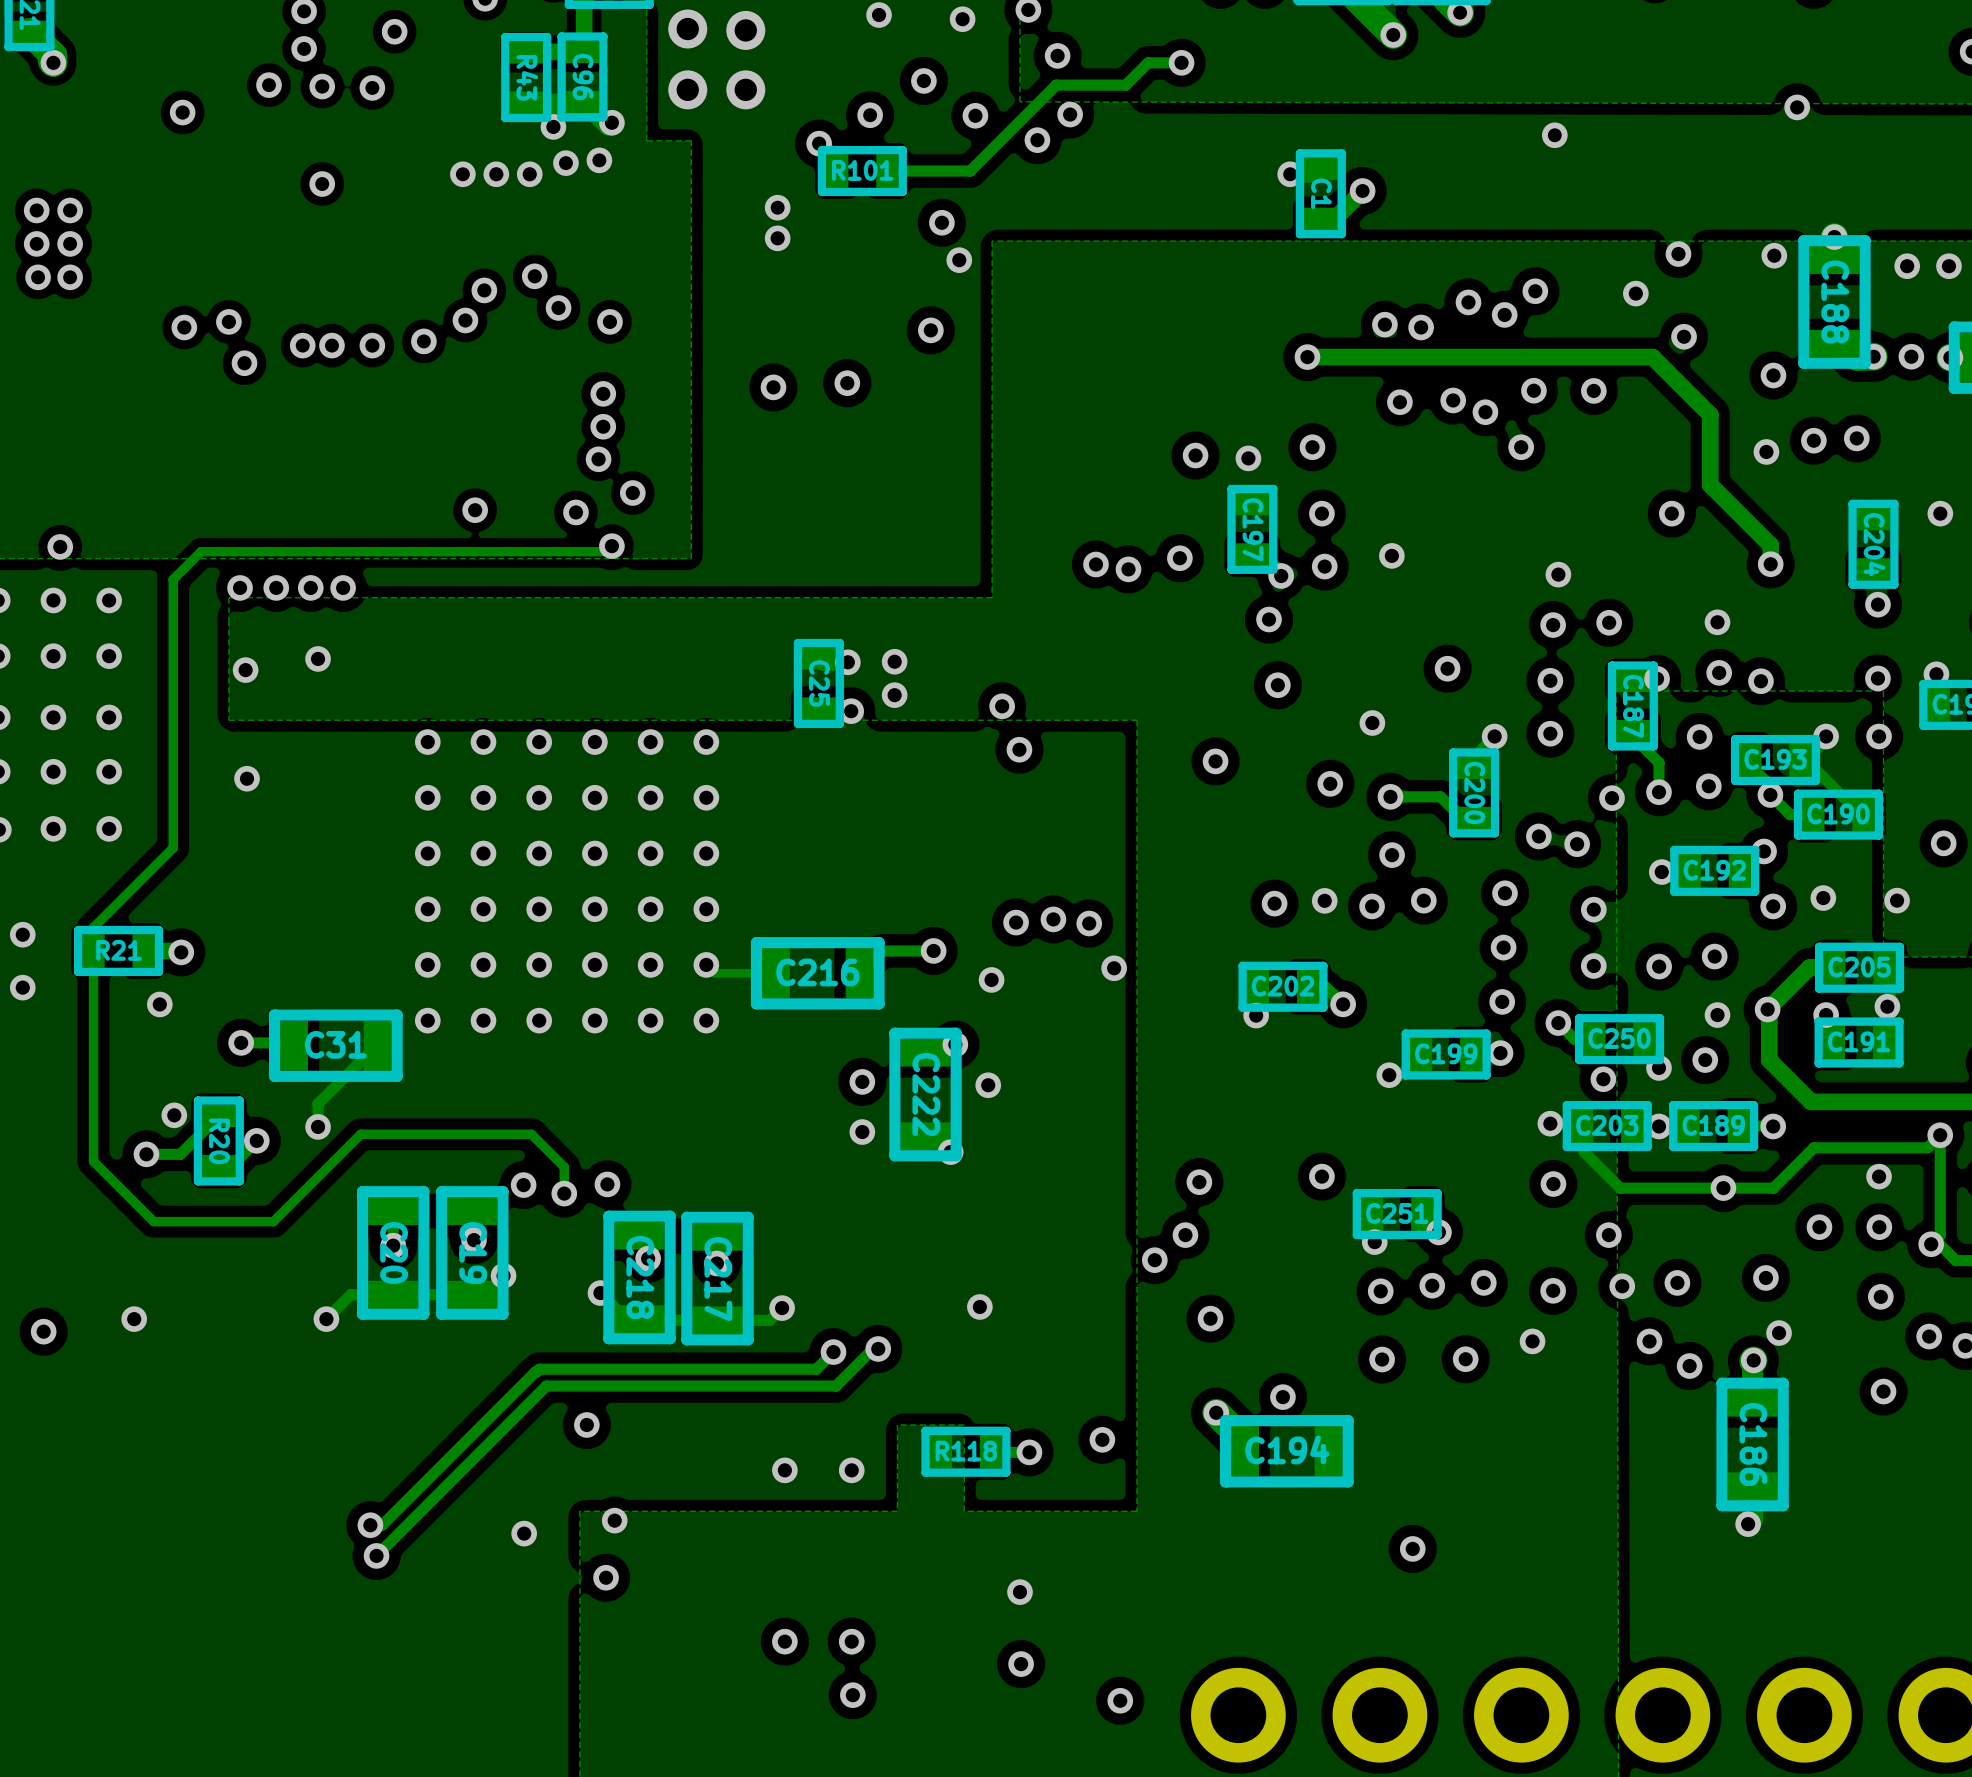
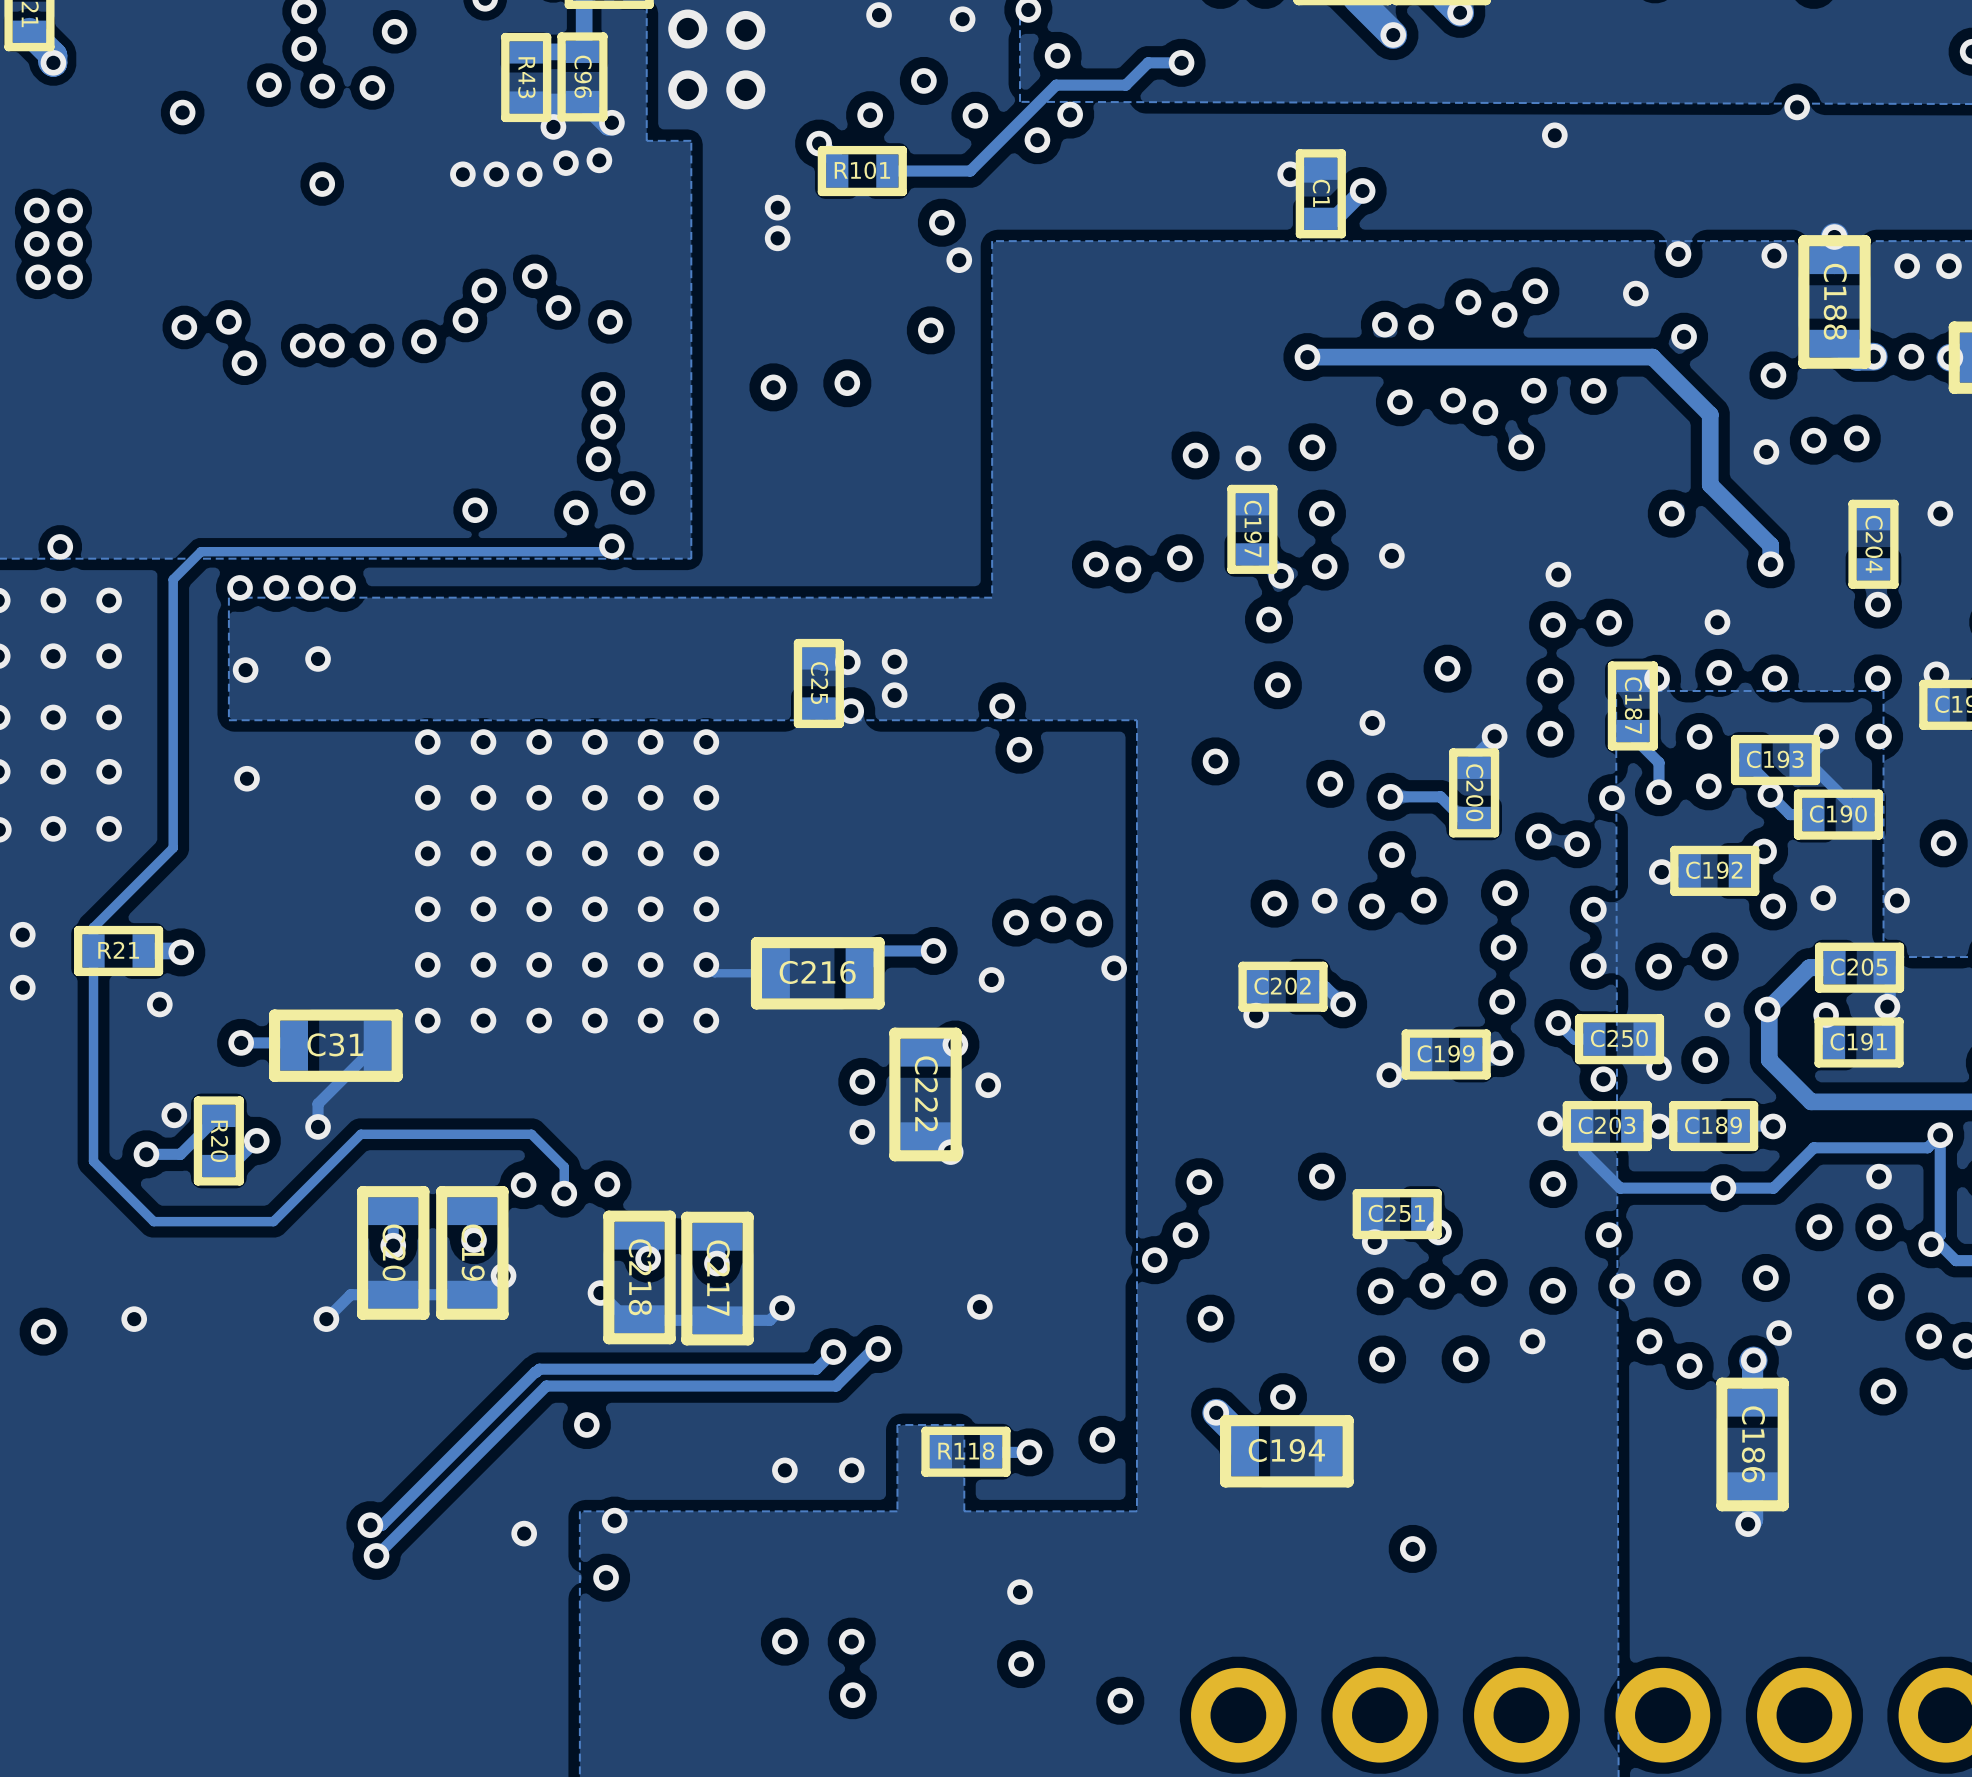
via position: (1760, 681) -> (1774, 678)

